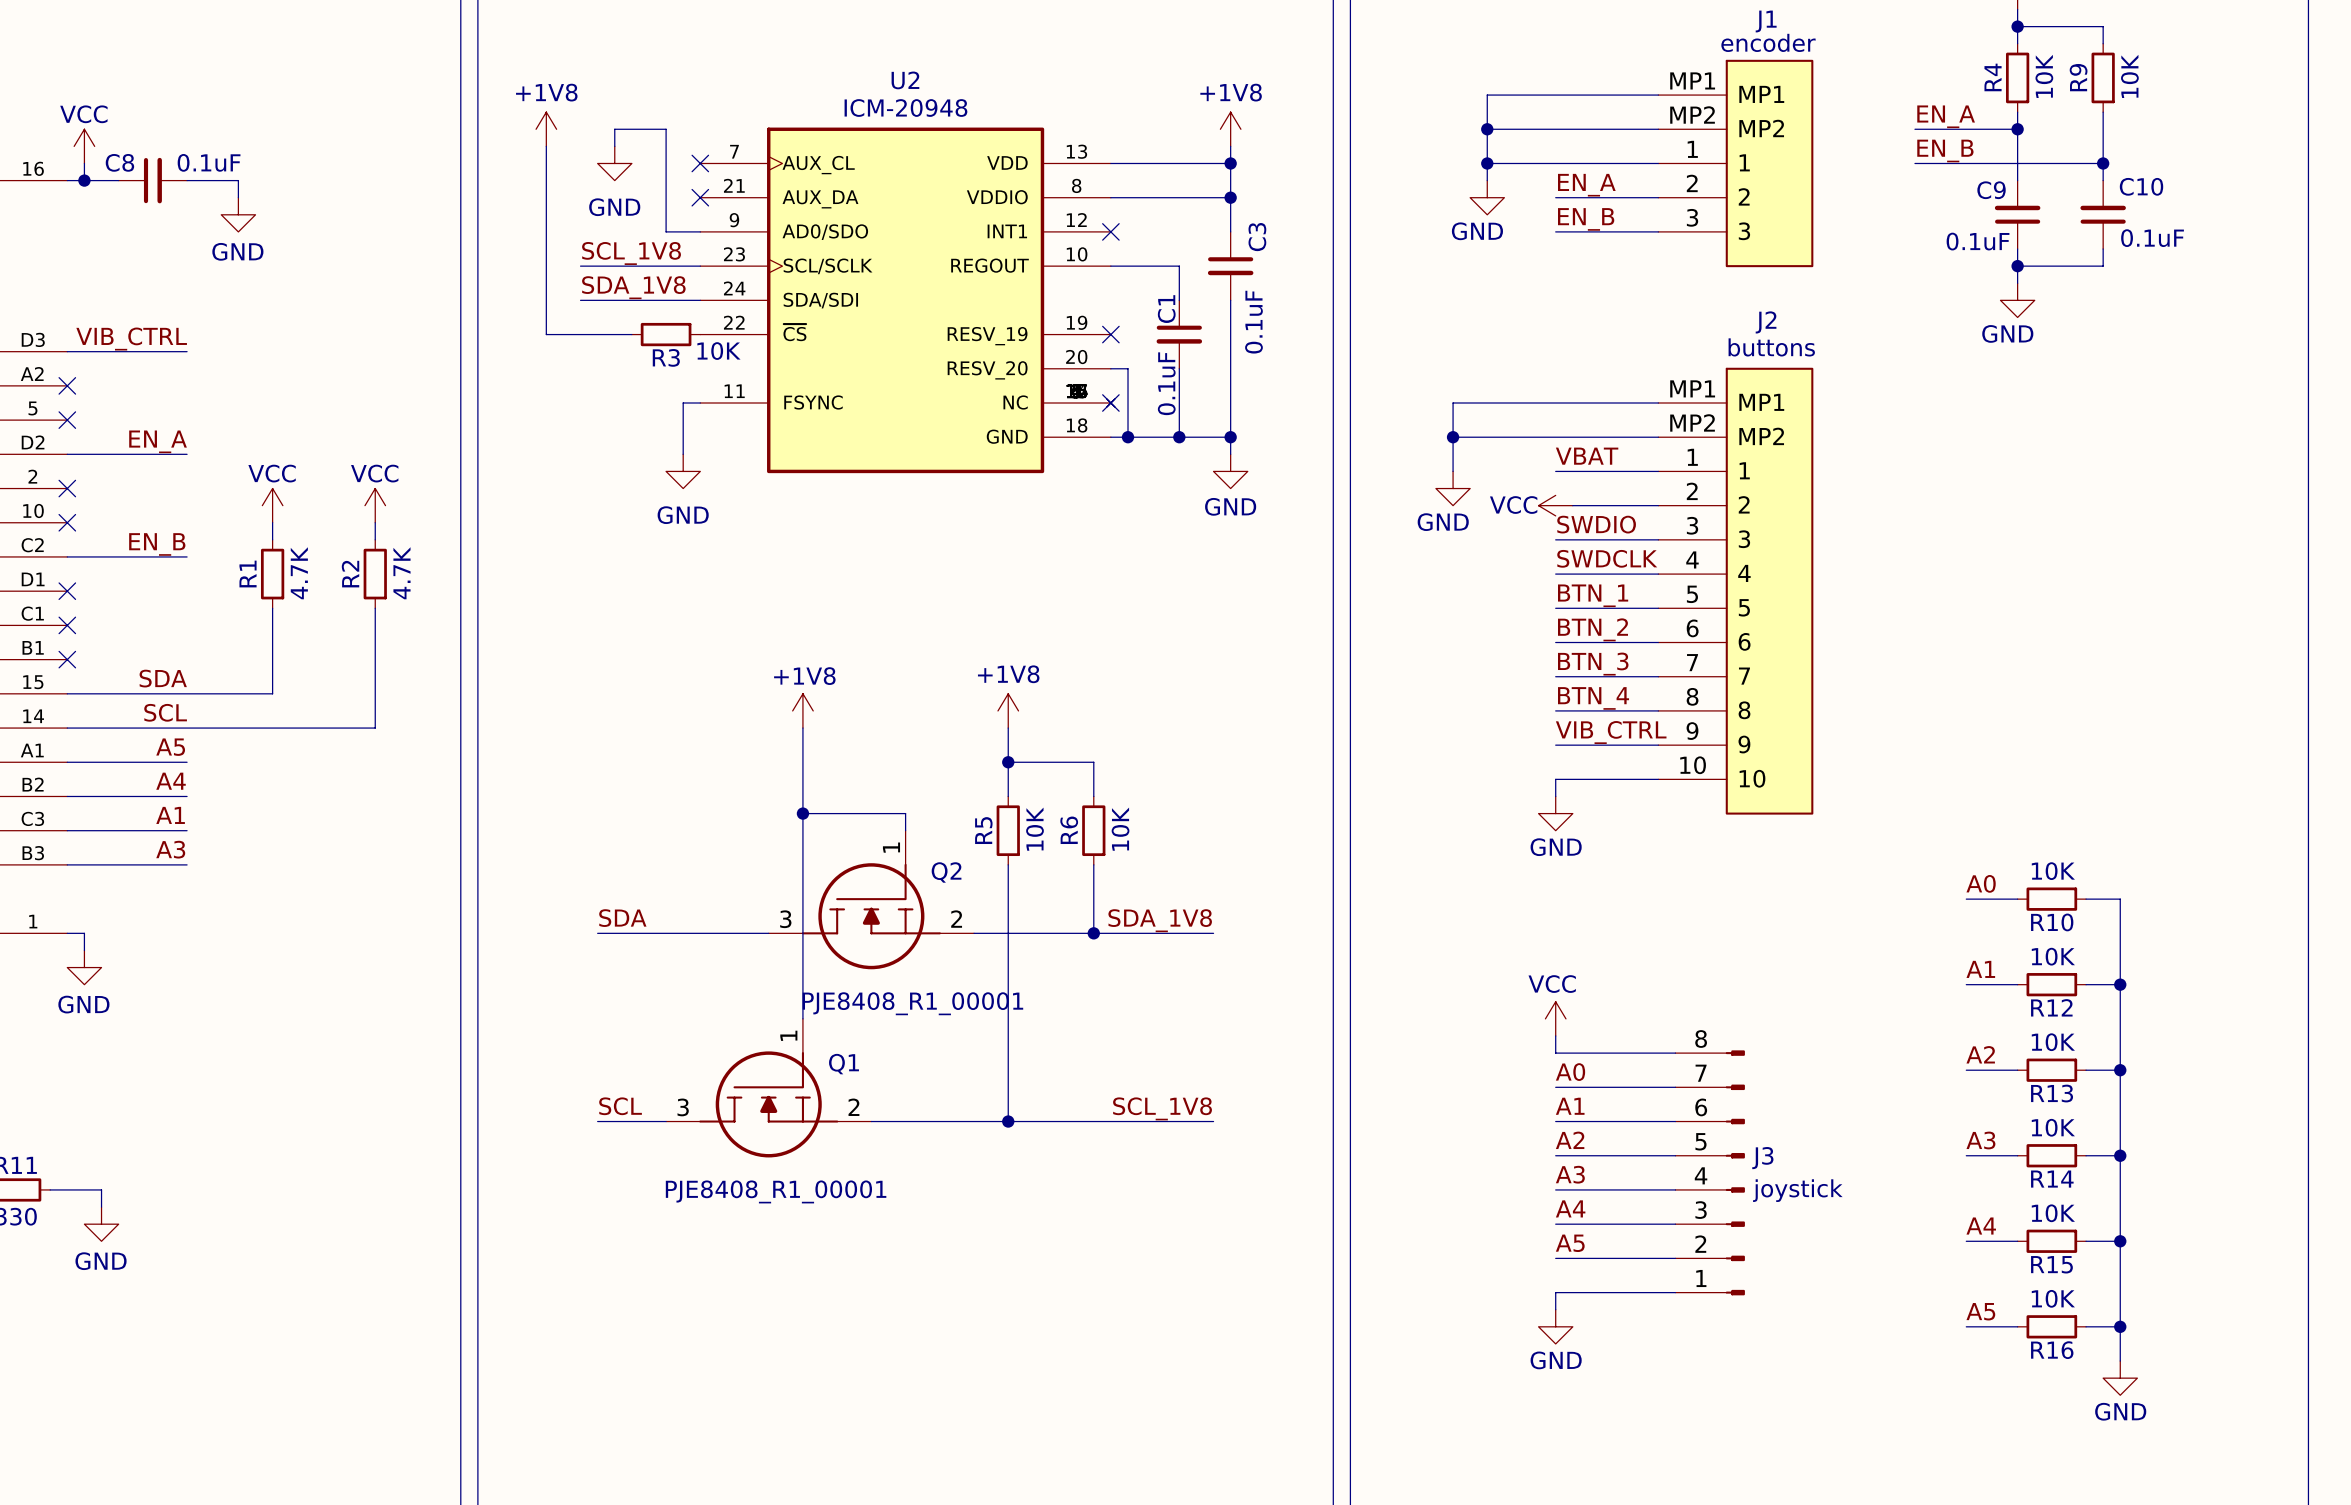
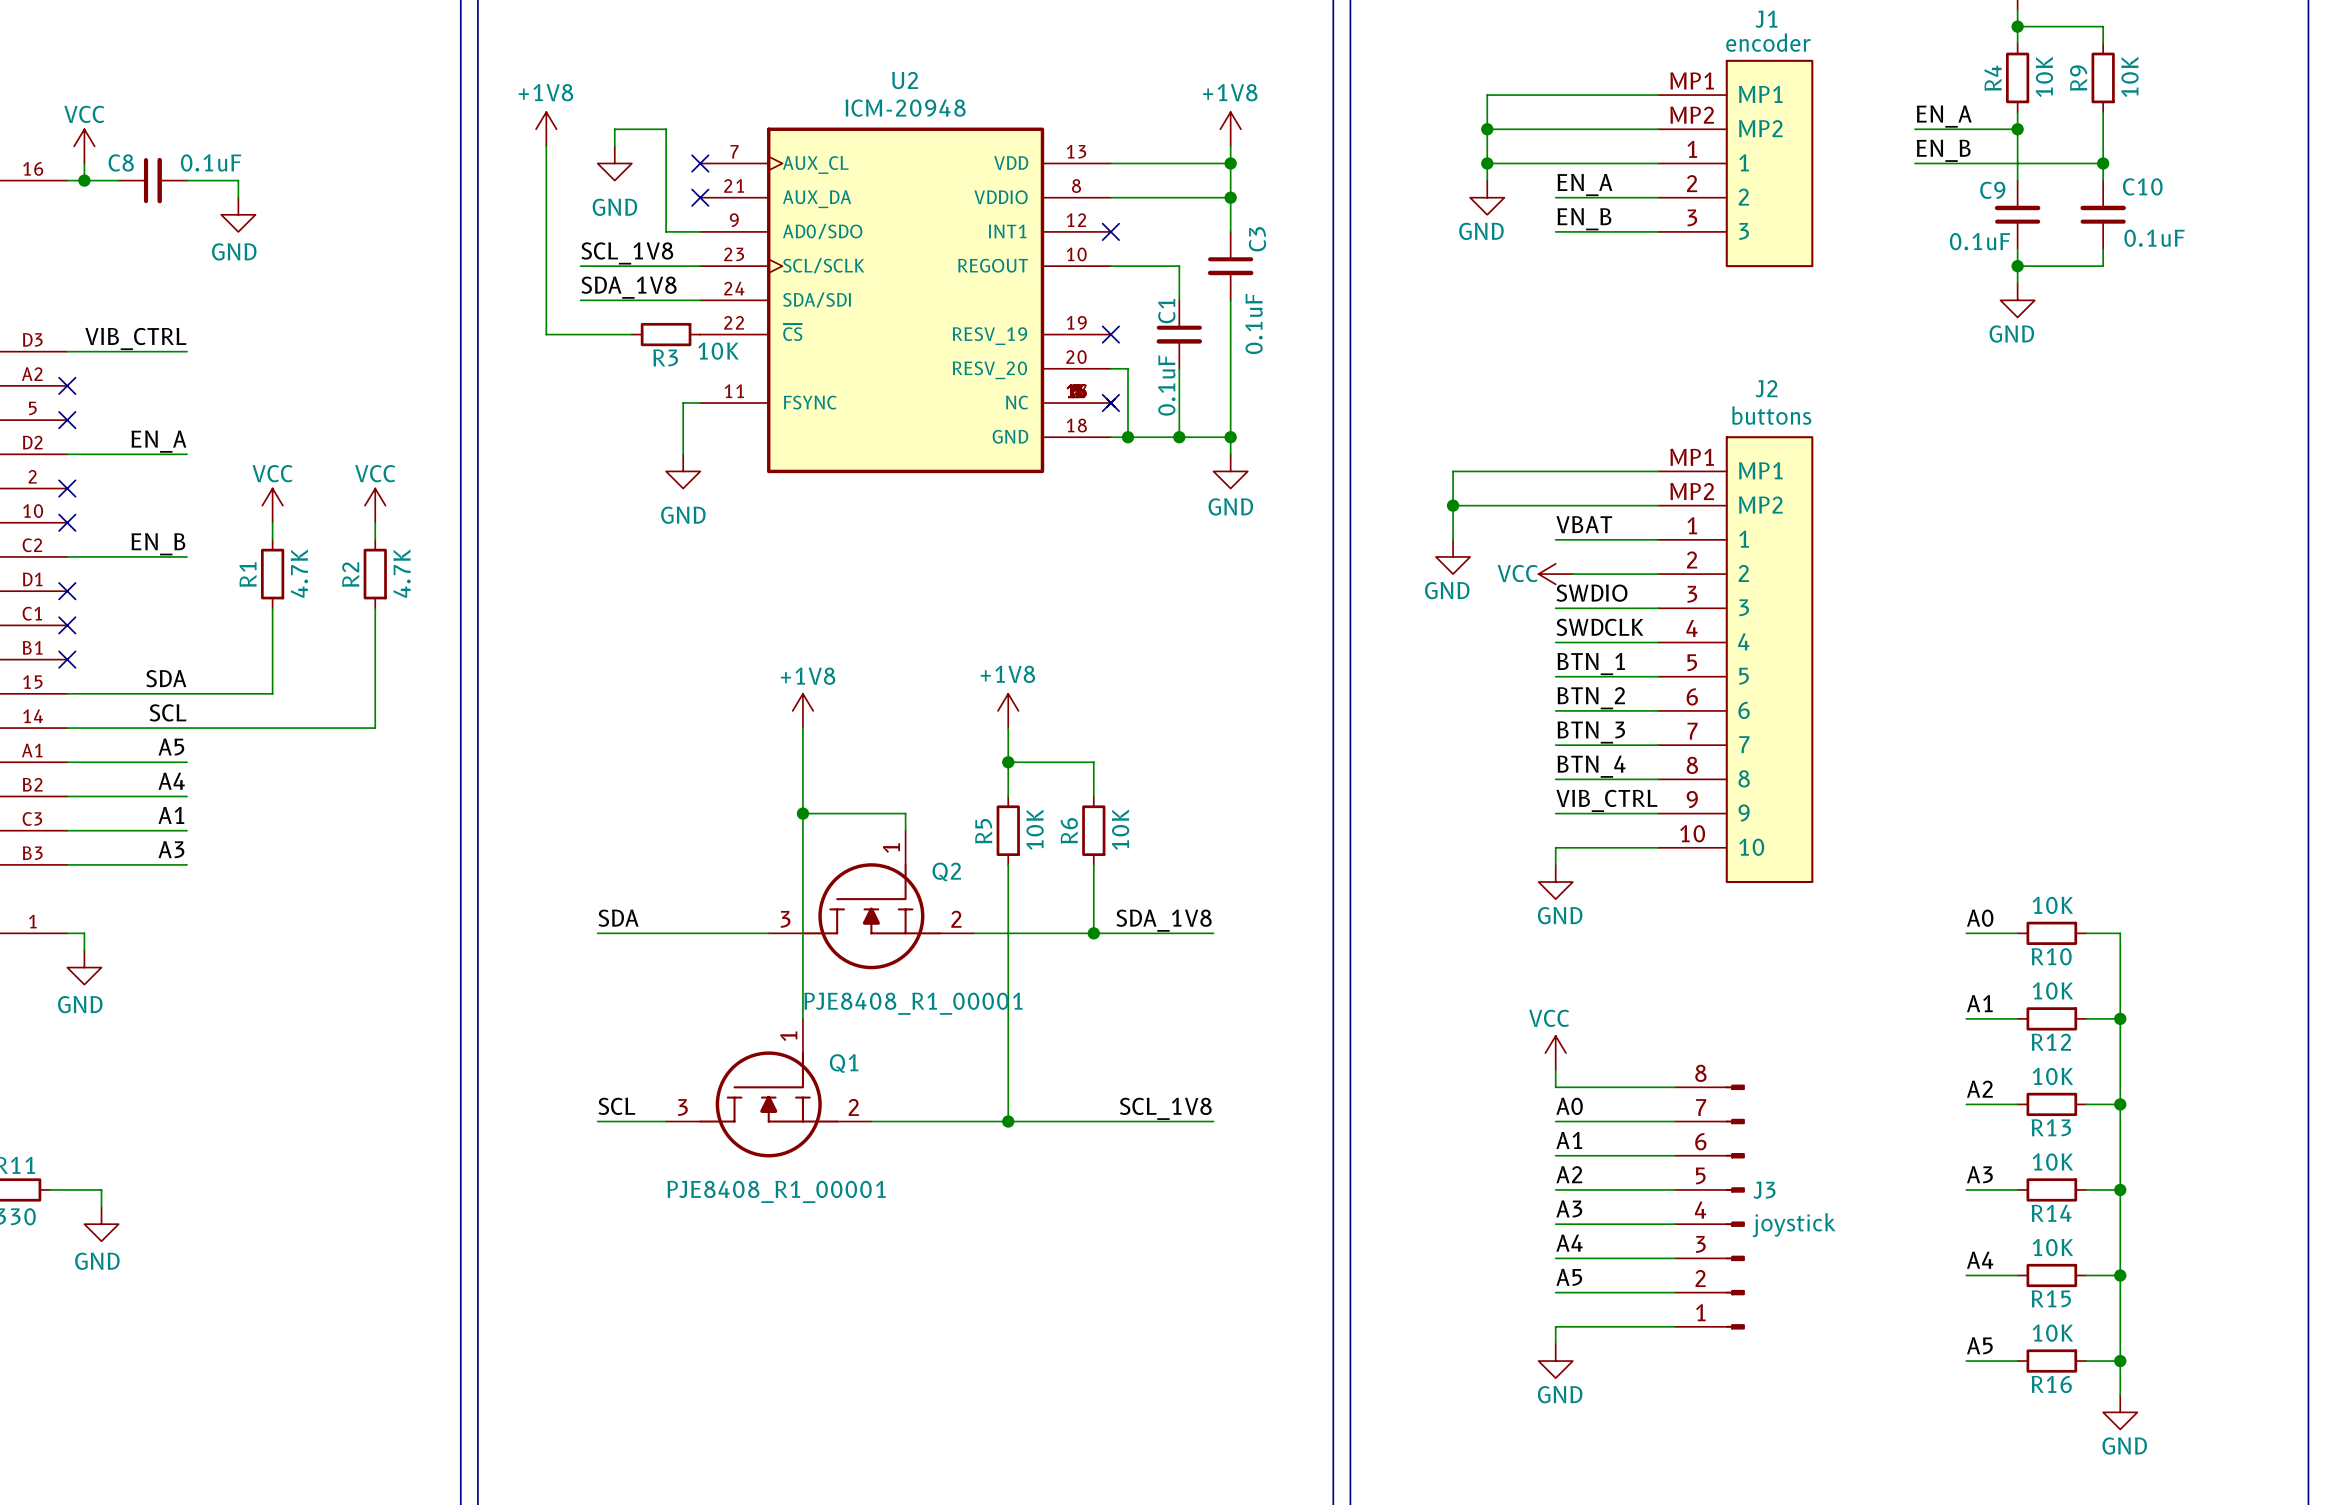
wire: (1658, 402) (1453, 402) (1453, 471) -> none
wire: (1453, 437) (1658, 437) -> none
junction position: (1453, 437) -> (1453, 505)
label: VBAT (1587, 456) -> none
wire: none -> (1555, 471) (1453, 471) (1453, 539)
power symbol position: GND (1453, 488) -> GND (1453, 556)
wire: none -> (1453, 505) (1572, 505)
power symbol position: VCC (1555, 505) -> VCC (1555, 574)
label: SWDIO (1596, 524) -> VBAT (1584, 524)
label: SWDCLK (1607, 558) -> none
J2 position: (1735, 591) -> (1735, 659)
label: BTN_1 (1593, 595) -> SWDIO (1592, 593)
label: BTN_2 (1593, 629) -> SWDCLK (1600, 627)
label: BTN_3 (1593, 664) -> BTN_1 (1591, 664)
label: BTN_4 (1593, 698) -> BTN_2 (1591, 698)
label: VIB_CTRL (1611, 732) -> BTN_3 (1591, 732)
label: none -> BTN_4 (1591, 766)
wire: (1555, 779) (1555, 796) -> none
label: none -> VIB_CTRL (1606, 800)
wire: none -> (1555, 813) (1658, 813)
power symbol position: GND (1555, 813) -> GND (1555, 882)
wire: none -> (1658, 847) (1555, 847) (1555, 864)
label position: A0 (1981, 883) -> A0 (1980, 918)
wire: (1966, 899) (2017, 899) -> (1966, 933) (2017, 933)
R10 position: (2051, 899) -> (2051, 933)
wire: (2086, 899) (2120, 899) (2120, 933) -> (2086, 933) (2120, 933)
label position: A1 (1980, 969) -> A1 (1979, 1003)
wire: (1966, 984) (2017, 984) -> (1966, 1018) (2017, 1018)
R12 position: (2051, 984) -> (2051, 1018)
wire: (2086, 984) (2120, 984) -> (2086, 1018) (2120, 1018)
junction: (2120, 984) -> none
power symbol position: VCC (1555, 1018) -> VCC (1555, 1053)
junction: none -> (2120, 1018)
wire: (1555, 1035) (1555, 1053) (1675, 1053) -> none
label position: A2 (1980, 1054) -> A2 (1979, 1089)
wire: (1966, 1070) (2017, 1070) -> (1966, 1104) (2017, 1104)
R13 position: (2051, 1070) -> (2051, 1104)
wire: (2086, 1070) (2120, 1070) -> (2086, 1104) (2120, 1104)
junction: (2120, 1070) -> none
label: A0 (1570, 1072) -> none
junction: none -> (2120, 1104)
label: A1 (1570, 1106) -> A0 (1569, 1106)
label: A2 (1570, 1140) -> A1 (1569, 1140)
label position: A3 (1980, 1140) -> A3 (1979, 1174)
wire: (1966, 1155) (2017, 1155) -> (1966, 1189) (2017, 1189)
R14 position: (2051, 1155) -> (2051, 1189)
wire: (2086, 1155) (2120, 1155) -> (2086, 1189) (2120, 1189)
junction: (2120, 1155) -> none
J3 position: (1710, 1172) -> (1710, 1207)
label: A3 (1570, 1174) -> A2 (1569, 1174)
junction: none -> (2120, 1189)
label: A4 (1570, 1208) -> A3 (1569, 1208)
label position: A4 (1981, 1226) -> A4 (1980, 1260)
wire: (1966, 1241) (2017, 1241) -> (1966, 1275) (2017, 1275)
R15 position: (2051, 1241) -> (2051, 1275)
wire: (2086, 1241) (2120, 1241) -> (2086, 1275) (2120, 1275)
junction: (2120, 1241) -> none
label: A5 (1570, 1243) -> A4 (1569, 1243)
junction: none -> (2120, 1275)
label: none -> A5 (1569, 1277)
wire: (1555, 1292) (1555, 1309) -> (1555, 1070) (1555, 1087)
label position: A5 (1980, 1311) -> A5 (1979, 1345)
power symbol position: GND (1555, 1326) -> GND (1555, 1361)
wire: none -> (1675, 1326) (1555, 1326) (1555, 1343)
wire: (1966, 1326) (2017, 1326) -> (1966, 1361) (2017, 1361)
R16 position: (2051, 1326) -> (2051, 1361)
wire: (2086, 1326) (2120, 1326) -> none
junction: (2120, 1326) -> none
wire: none -> (2086, 1361) (2120, 1361) (2120, 1395)
junction: none -> (2120, 1361)
power symbol position: GND (2120, 1378) -> GND (2120, 1412)

